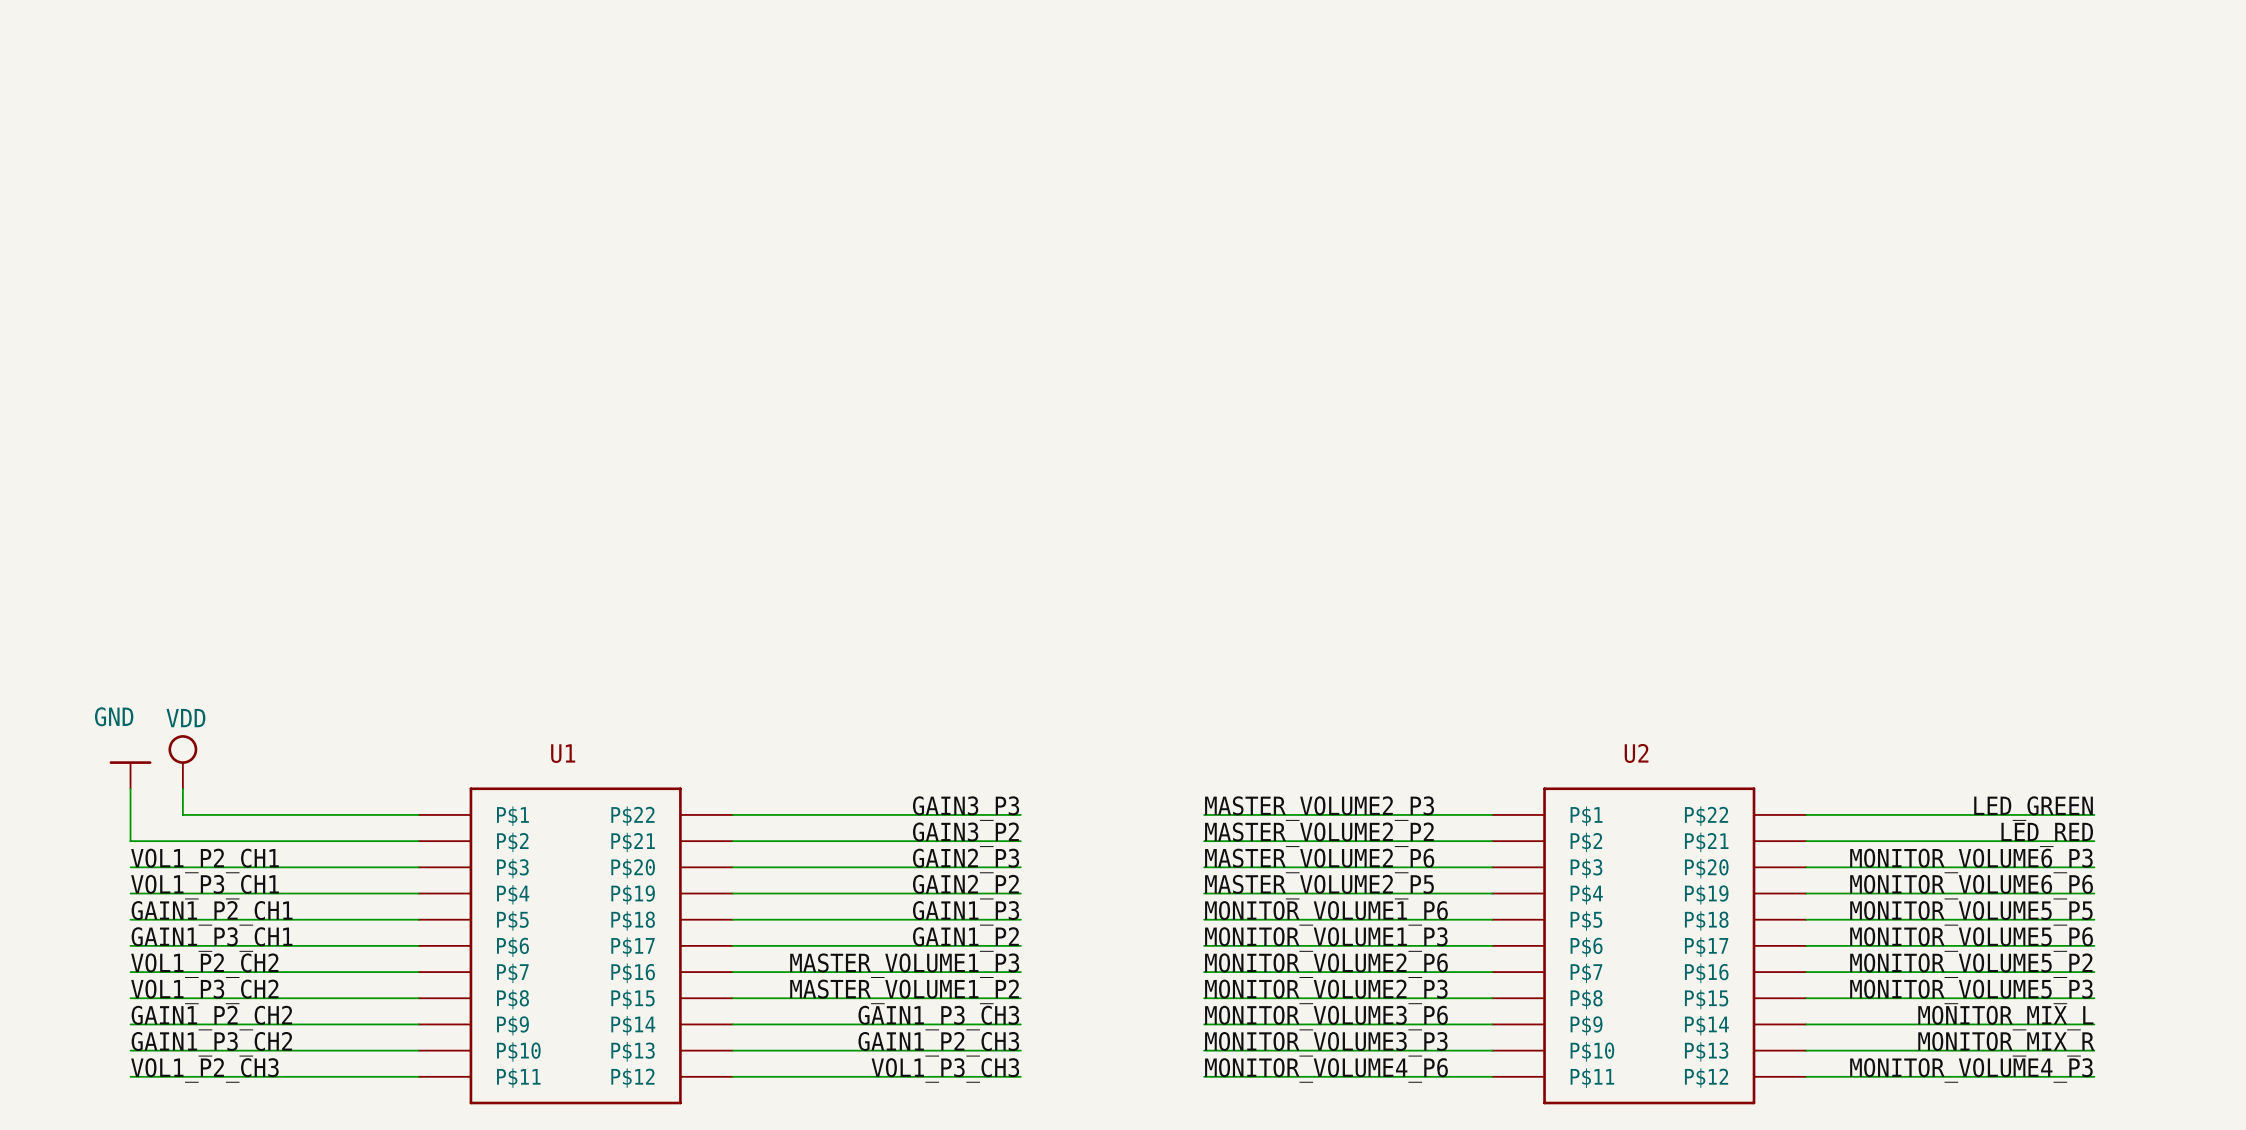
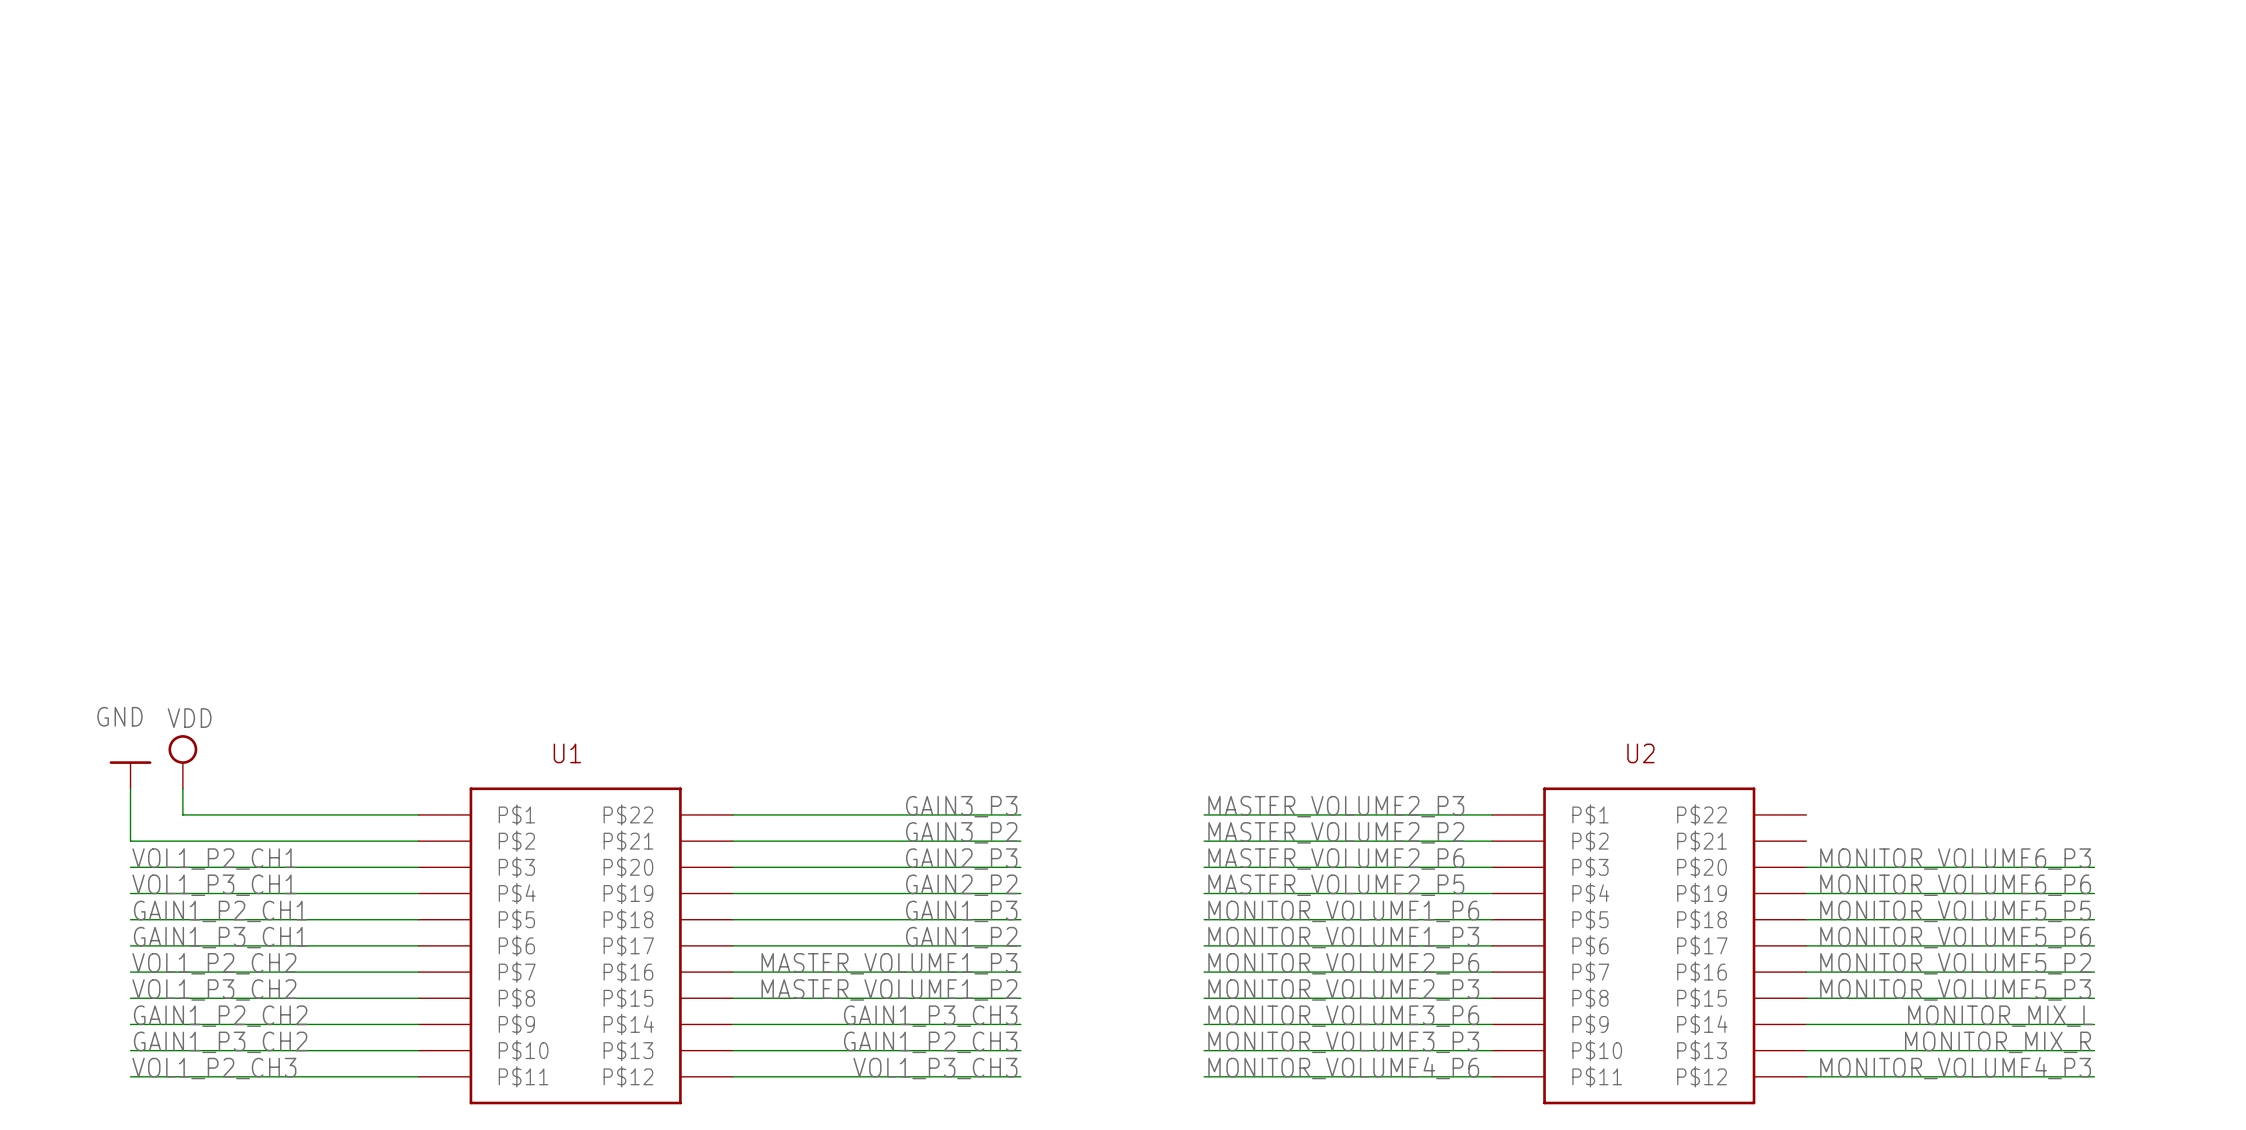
label: LED_GREEN (2033, 808) -> none
wire: (1806, 814) (2094, 814) -> none
label: LED_RED (2047, 834) -> none
wire: (1806, 841) (2094, 841) -> none

